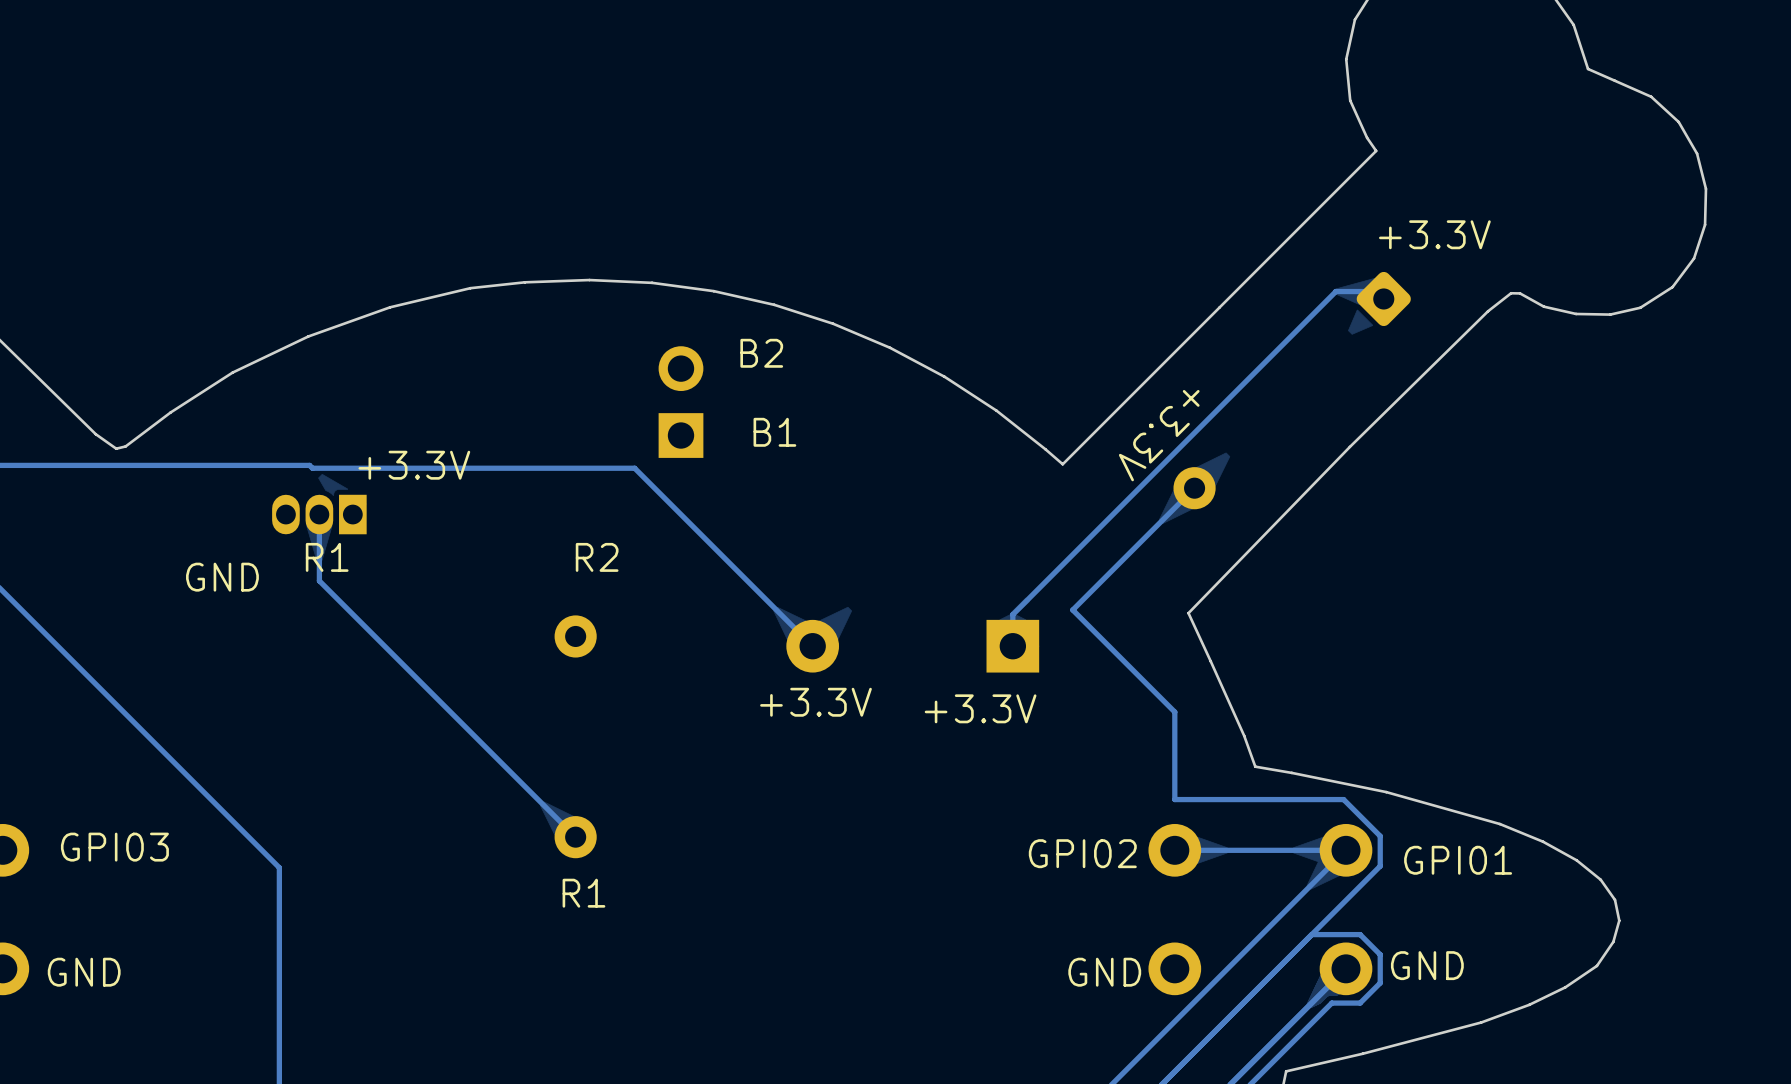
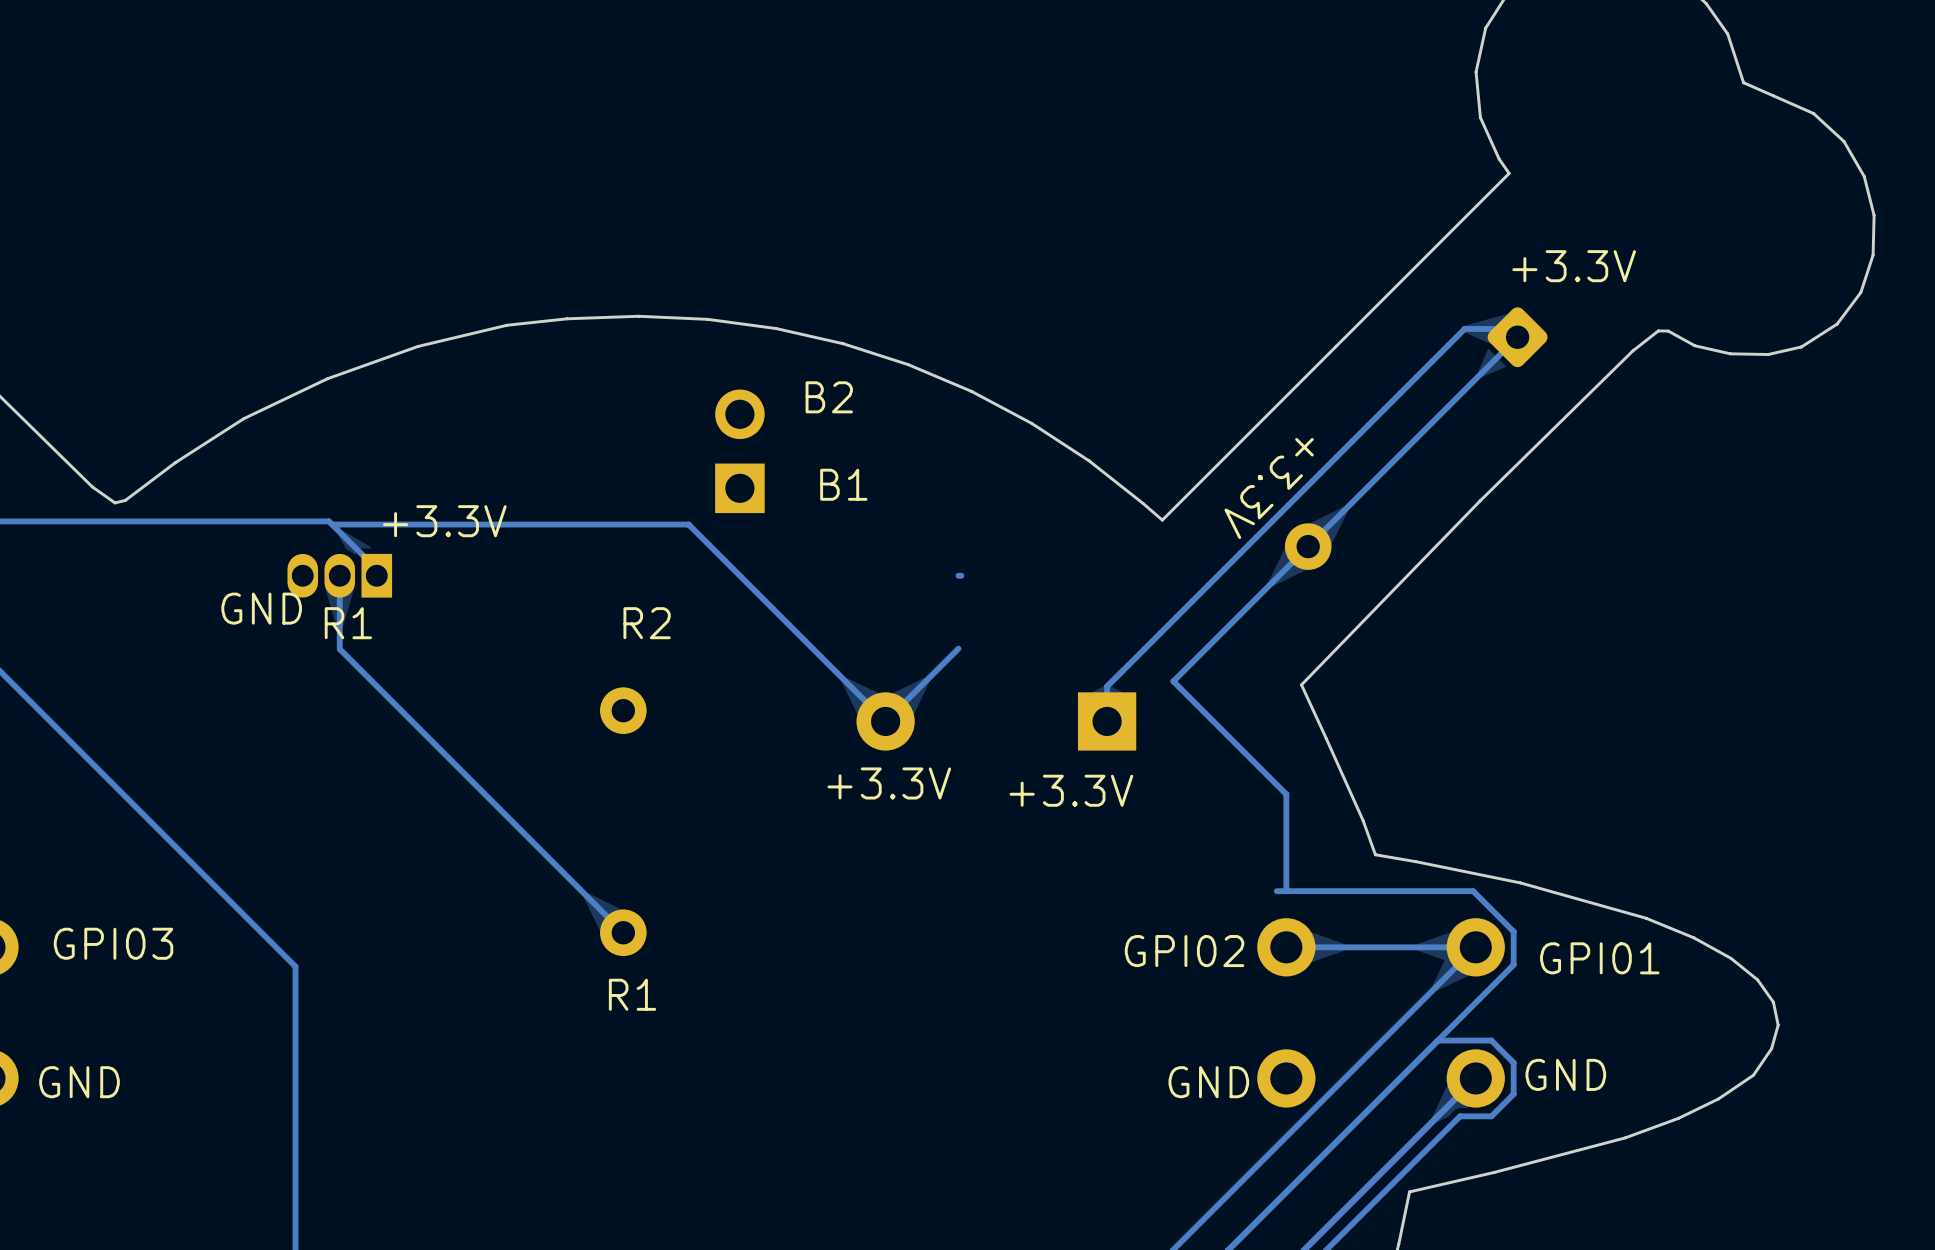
track: none -> (1517, 337) (1308, 546)
track: none -> (332, 524) (376, 569) (376, 575)
track: none -> (961, 575) (958, 575)
text position: GND (222, 577) -> GND (261, 608)
track: none -> (958, 648) (885, 721)
track: none -> (1286, 891) (1276, 891)

